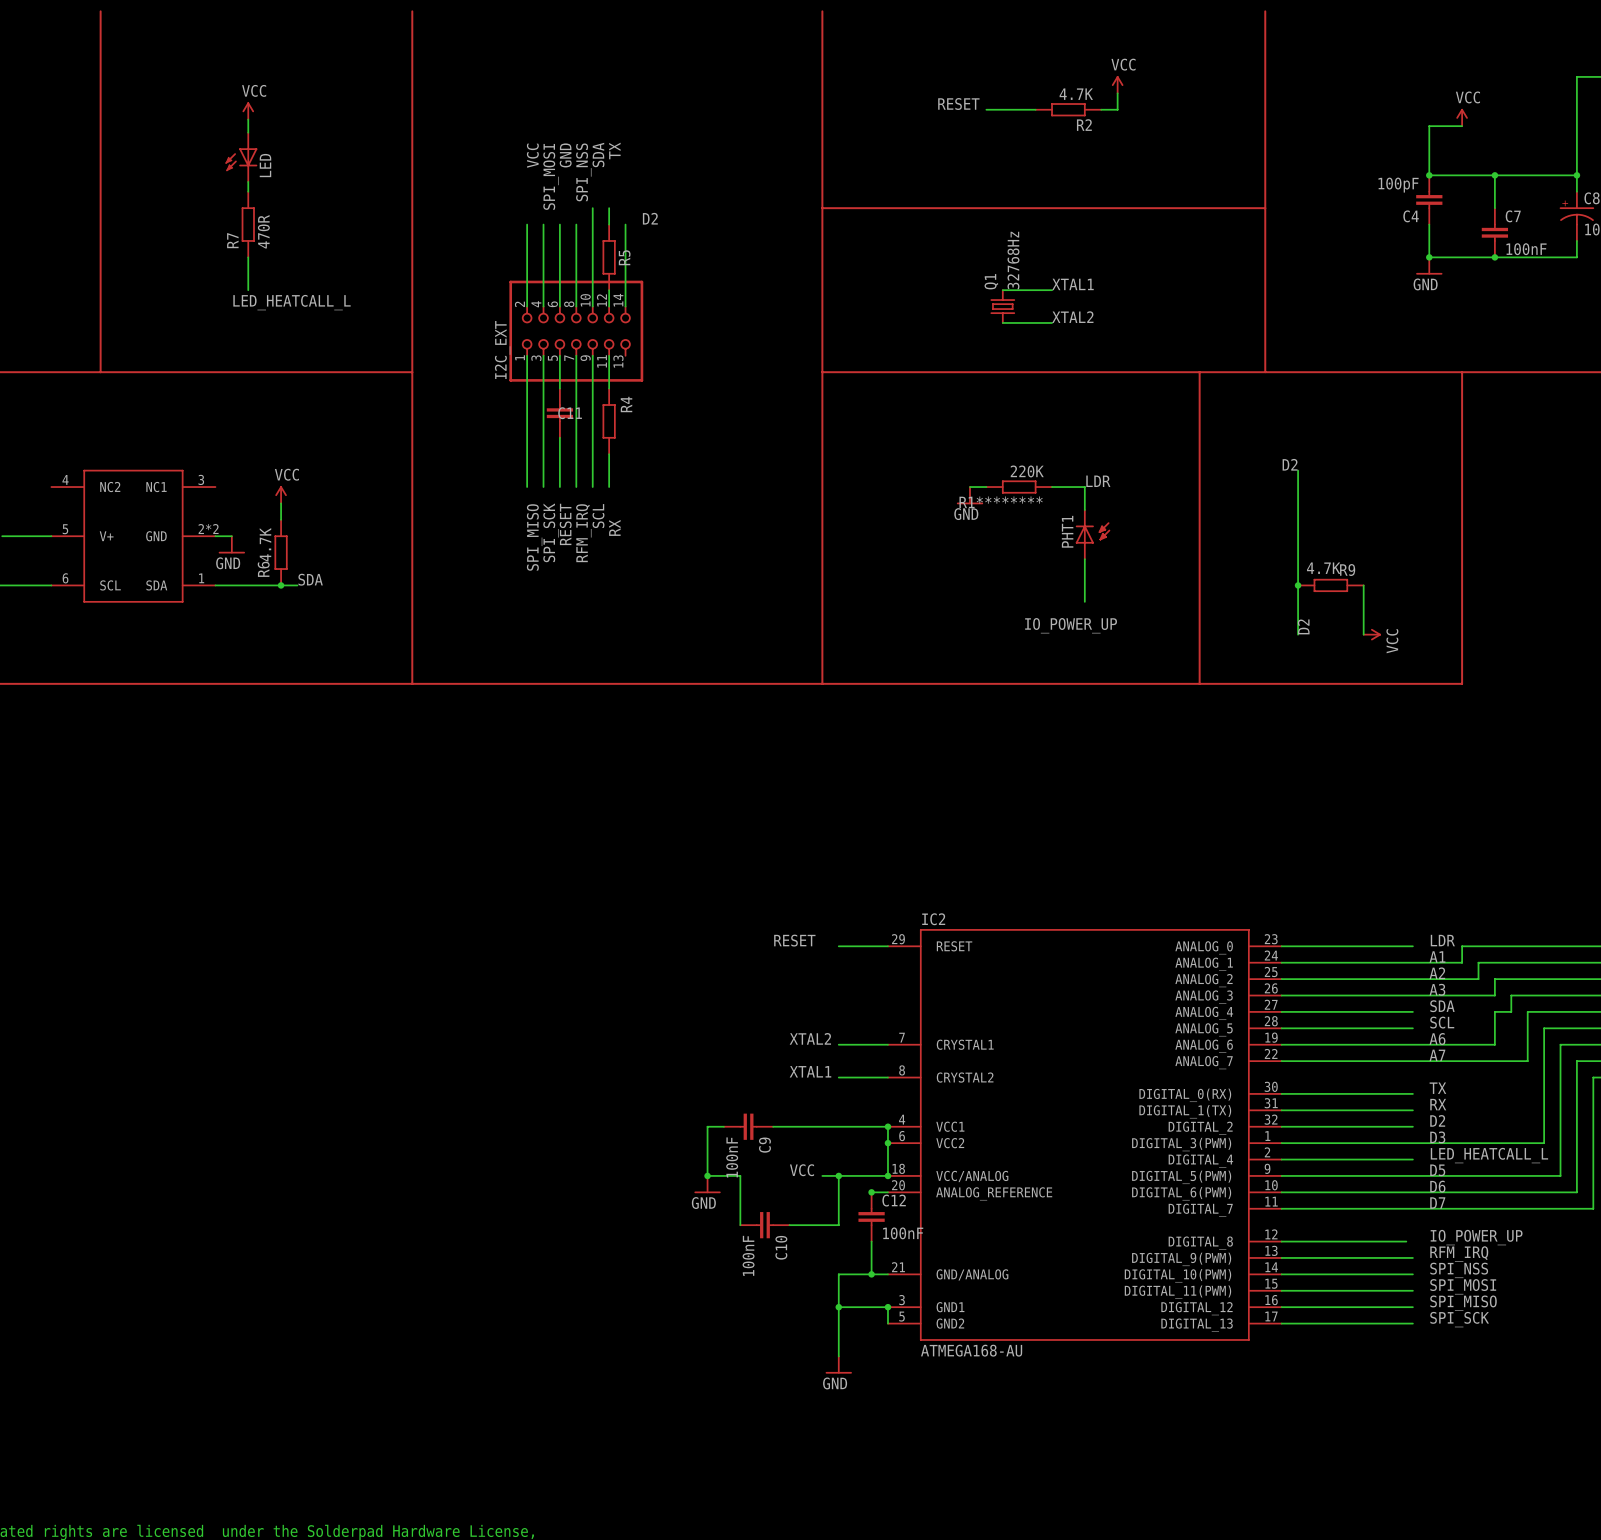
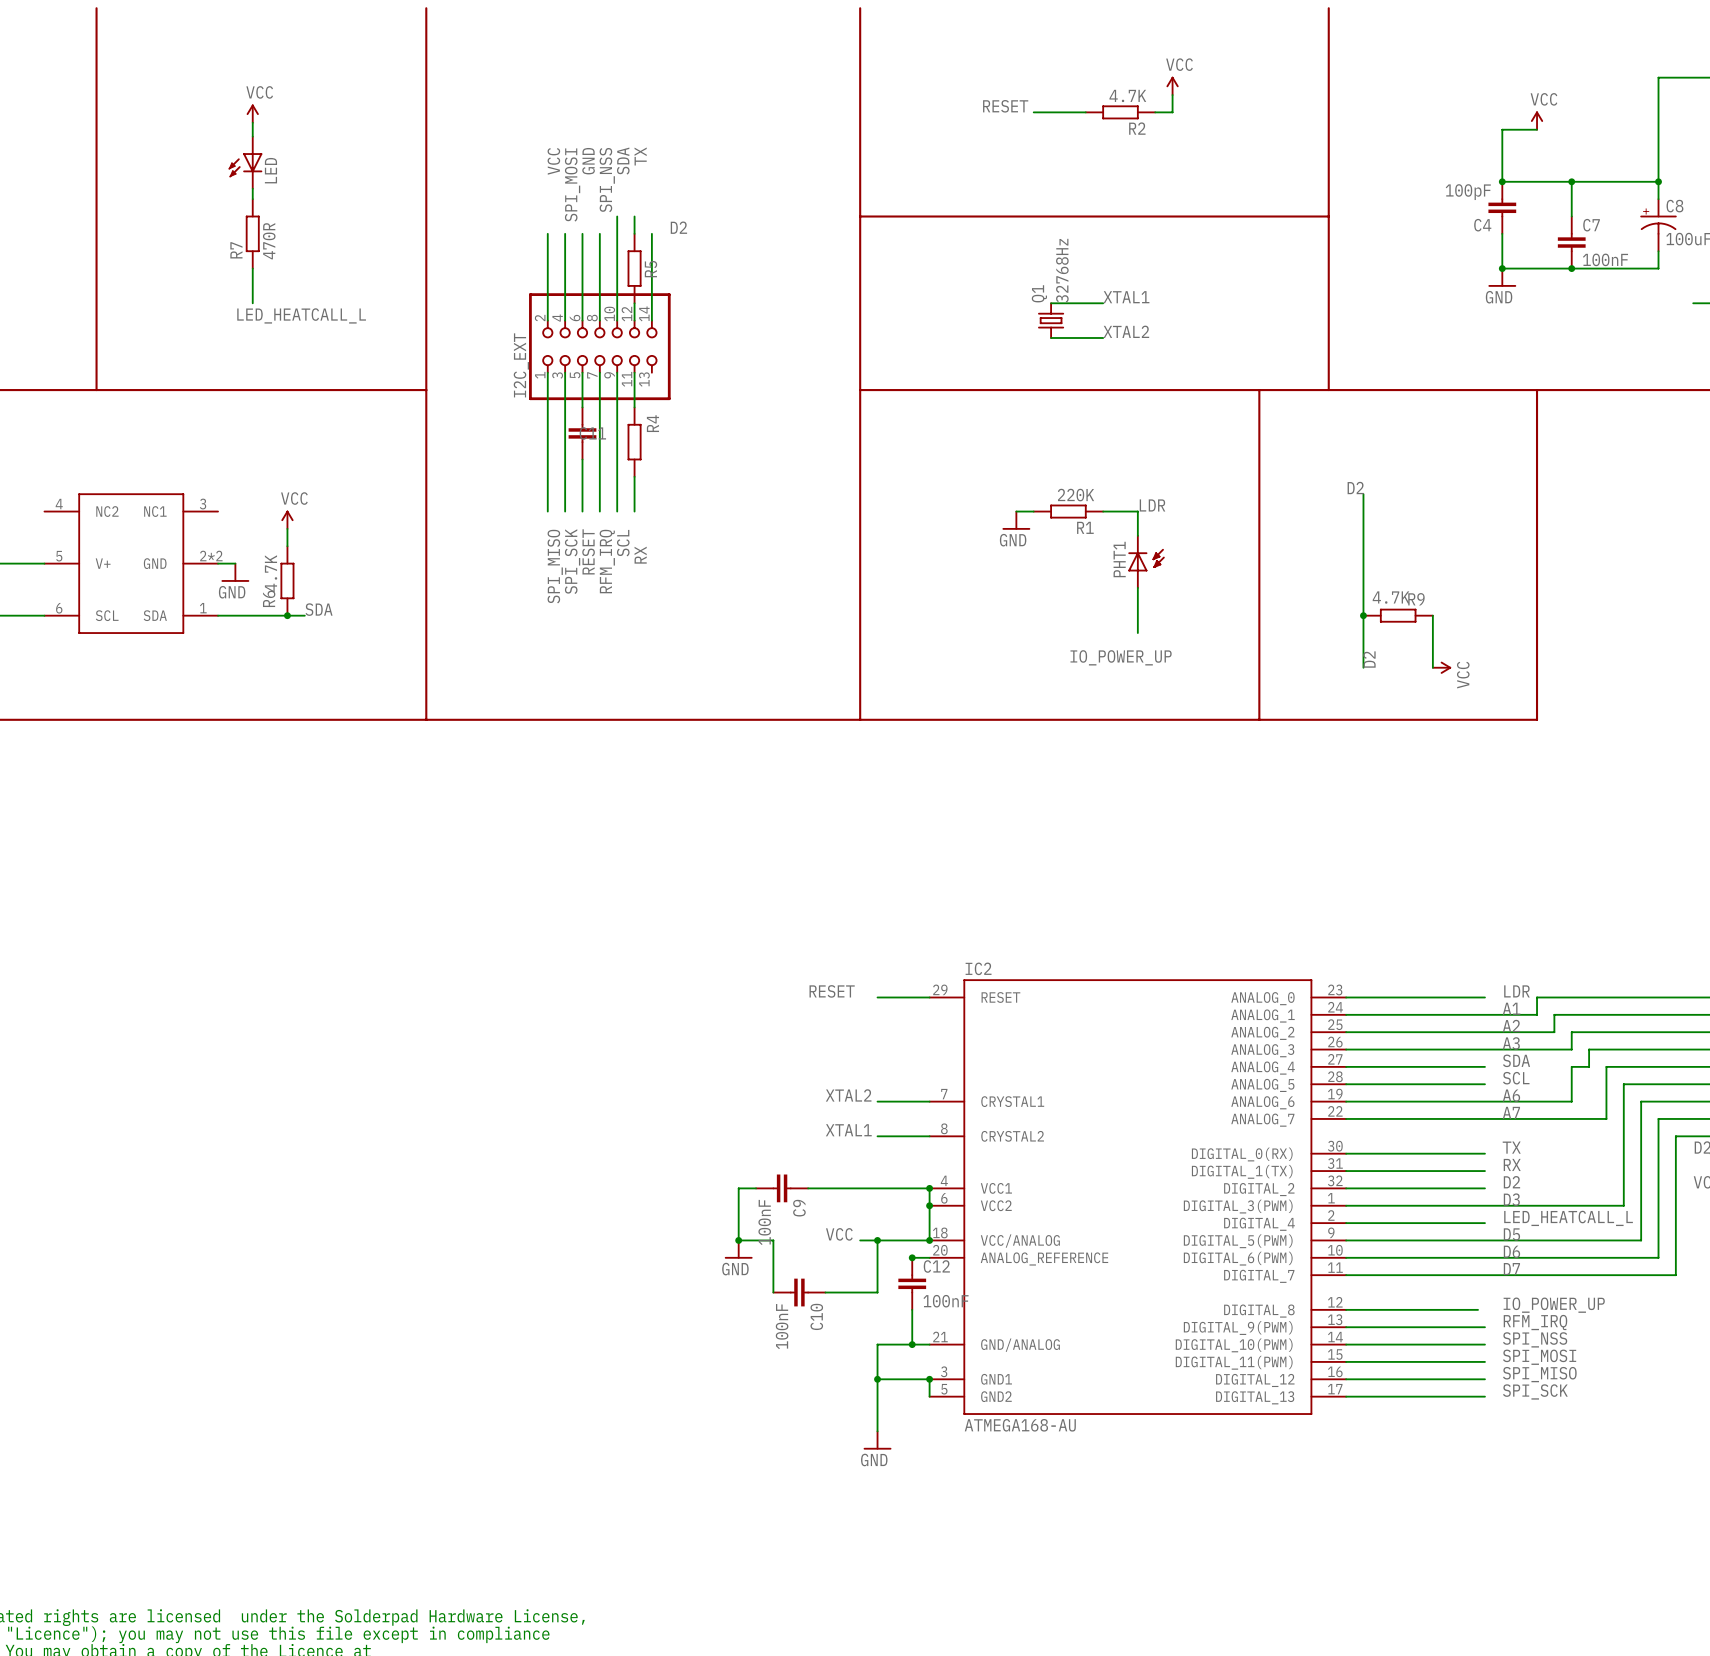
R1******** name: R1******** (1001, 502) -> R1 (1085, 527)

